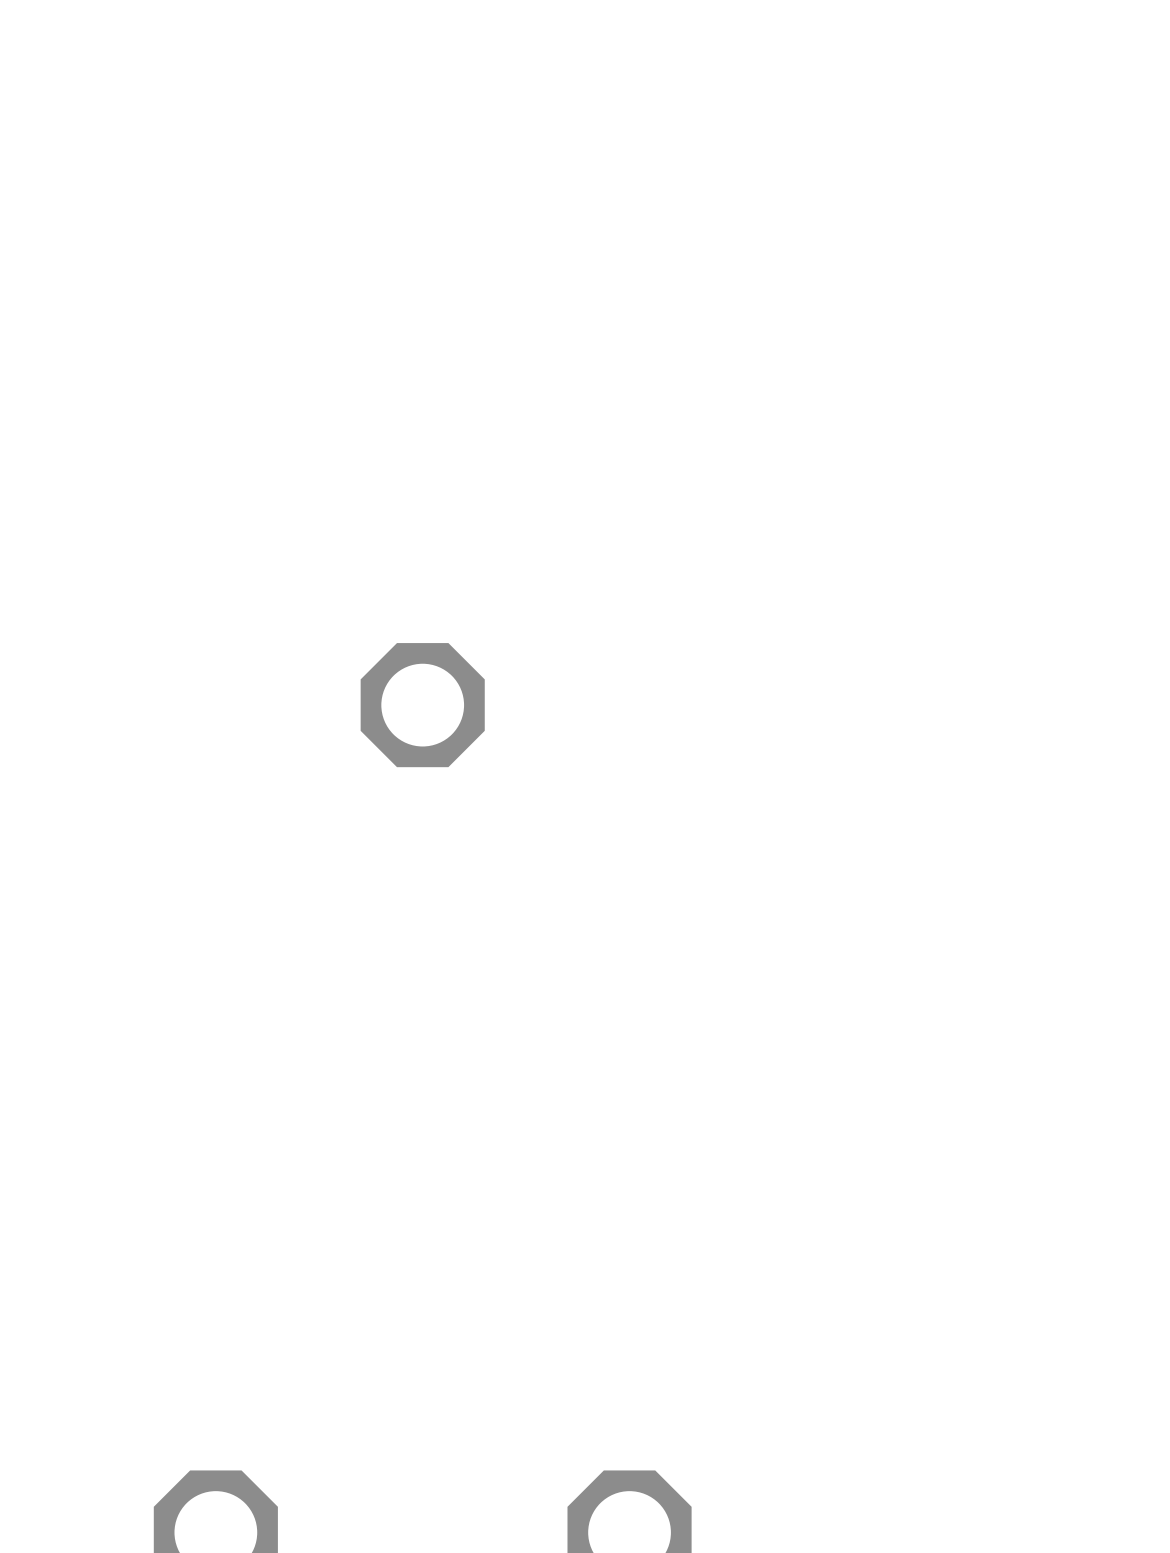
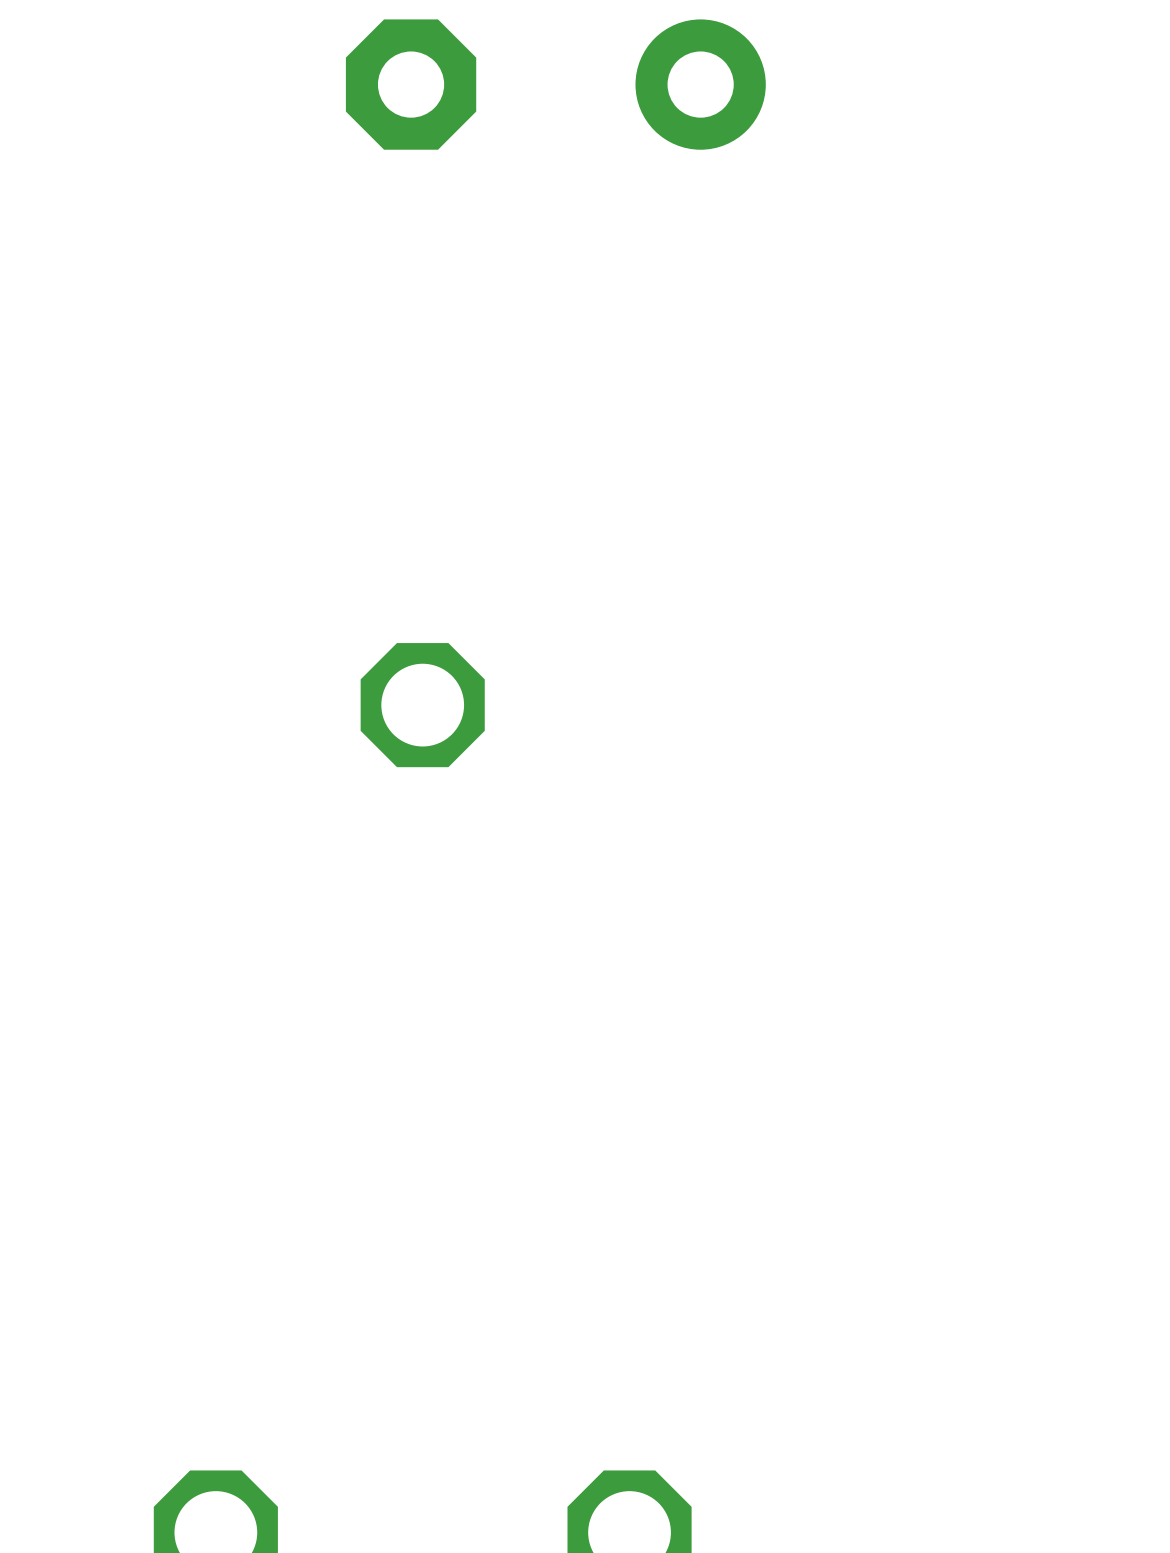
part: none -> (555, 84)

